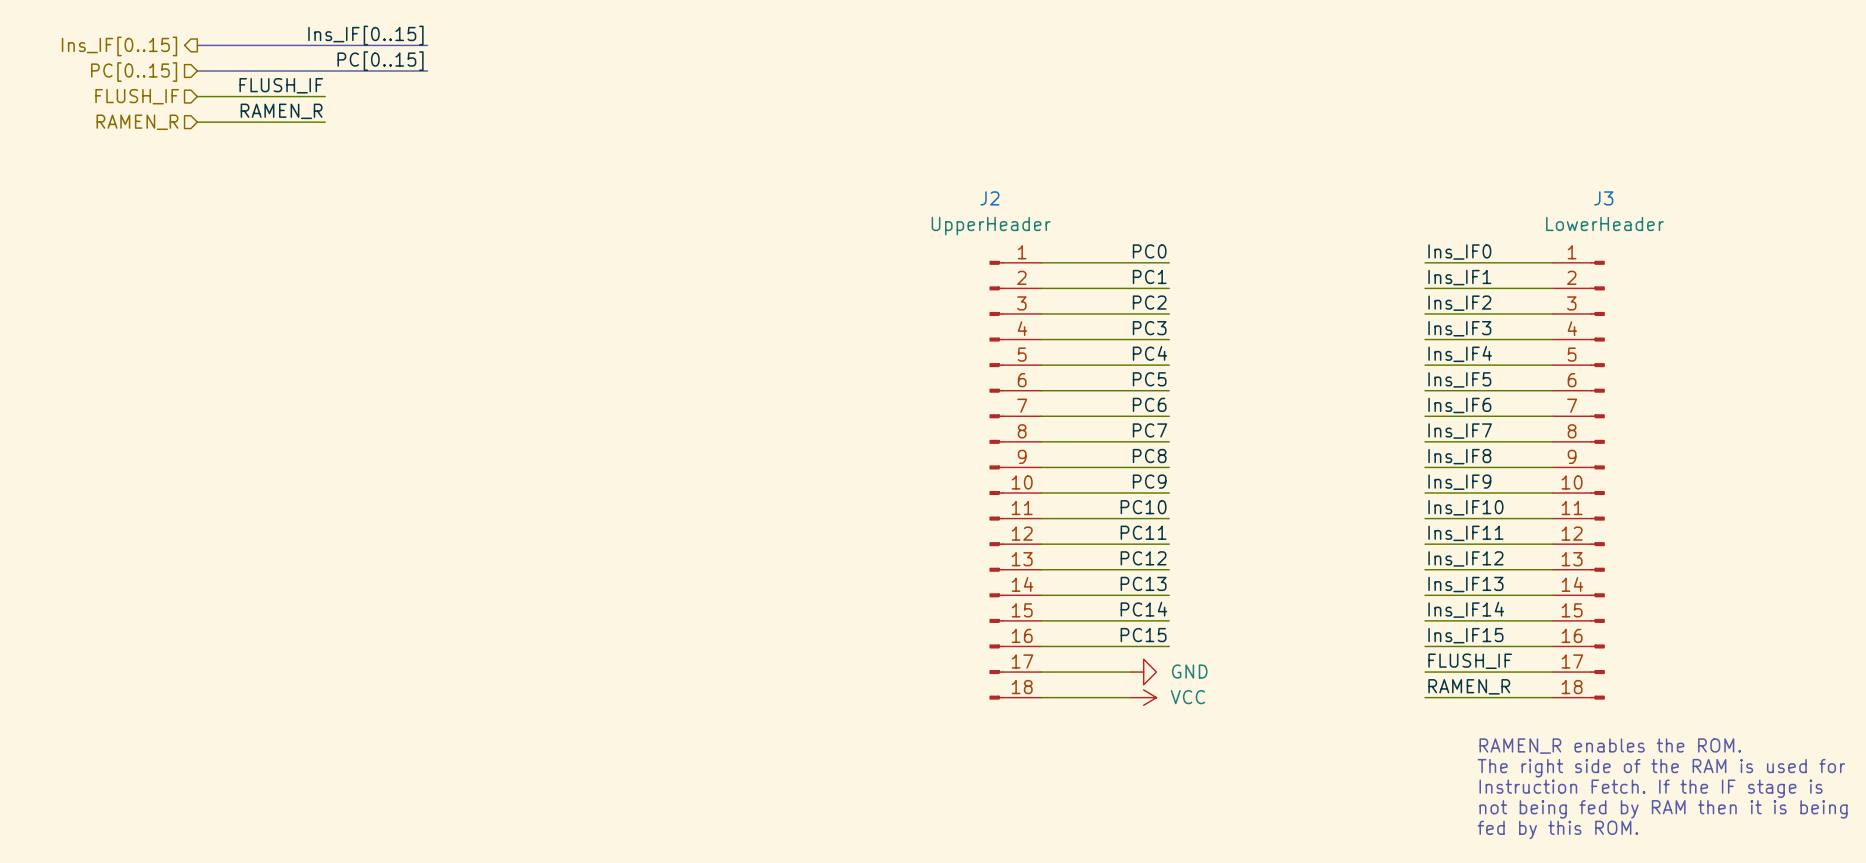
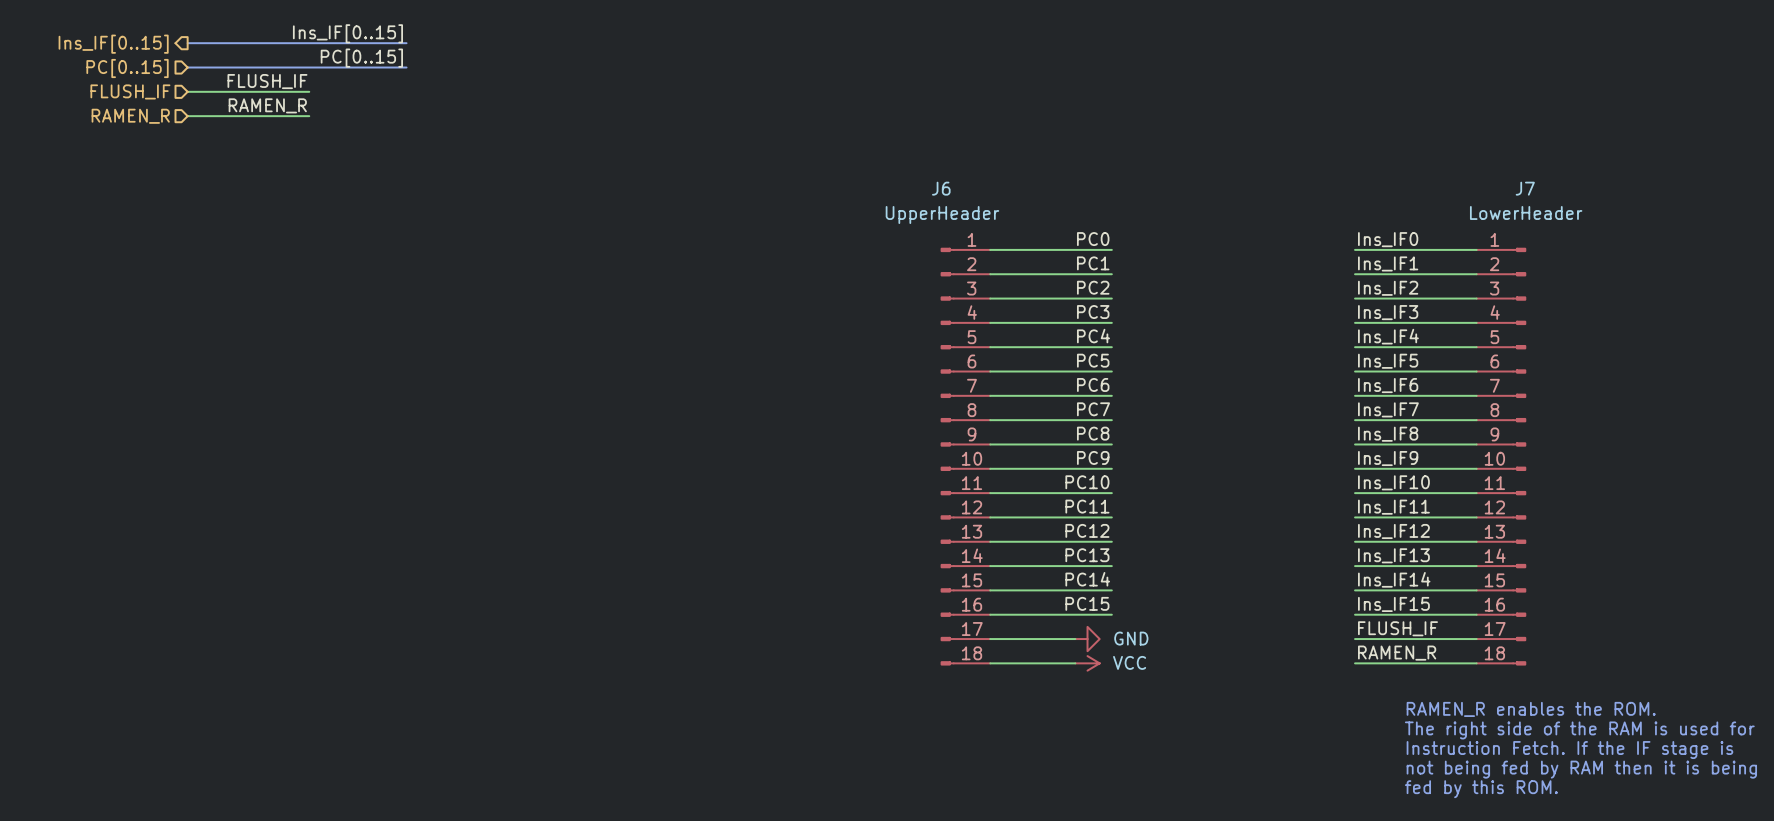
J2 name: J2 (989, 198) -> J6 (941, 188)
J3 name: J3 (1603, 198) -> J7 (1525, 188)

